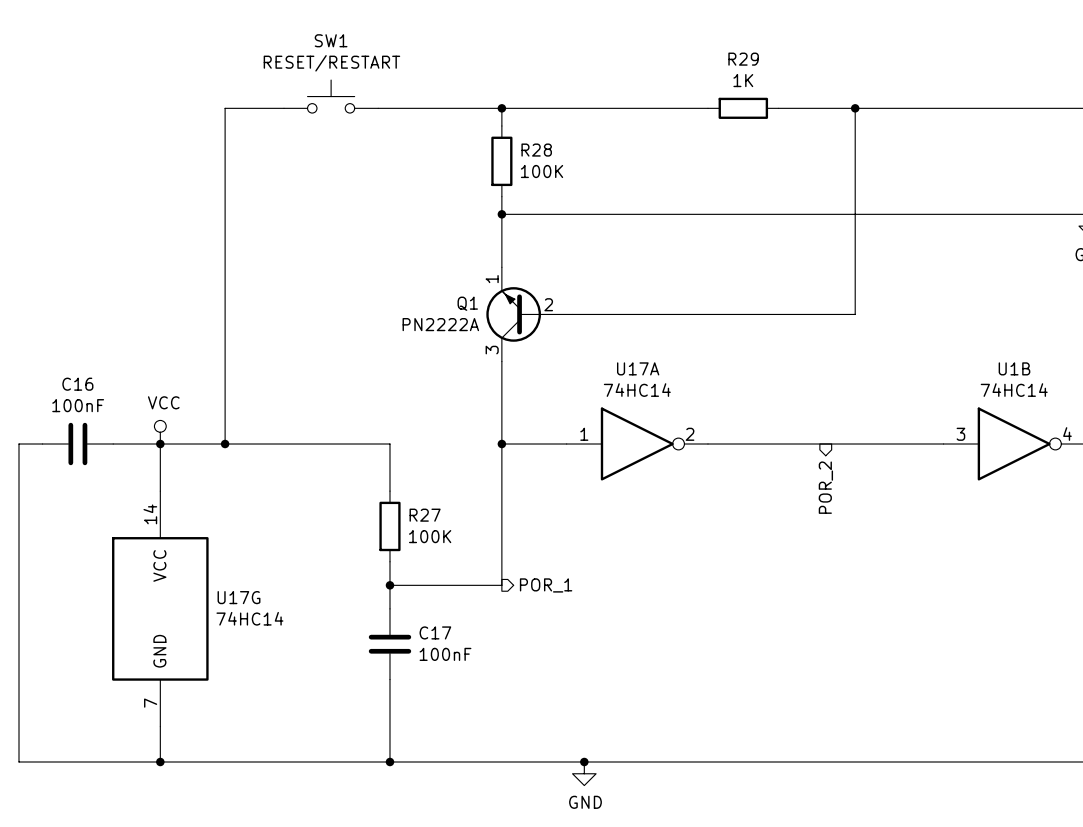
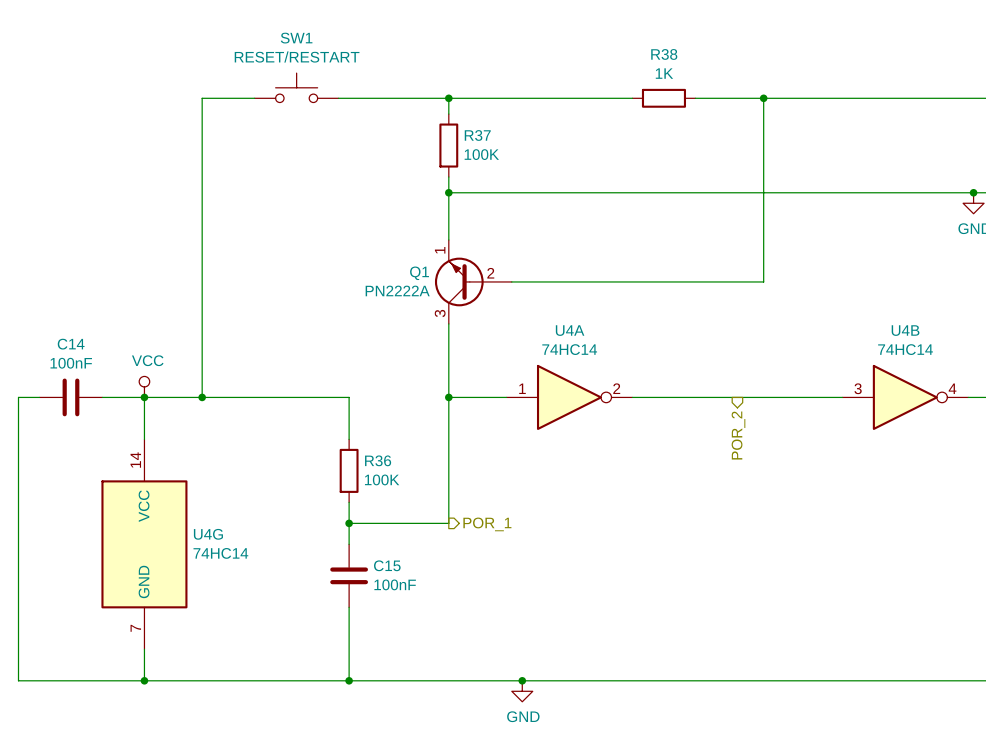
R29 name: R29 (743, 59) -> R38 (664, 54)
R28 name: R28 (536, 150) -> R37 (477, 135)
U17A name: U17A (638, 368) -> U4A (570, 330)
U1B name: U1B (1014, 368) -> U4B (905, 330)
C16 name: C16 (77, 384) -> C14 (71, 344)
R27 name: R27 (425, 515) -> R36 (378, 460)
U17G name: U17G (238, 597) -> U4G (208, 534)
C17 name: C17 (435, 632) -> C15 (387, 565)

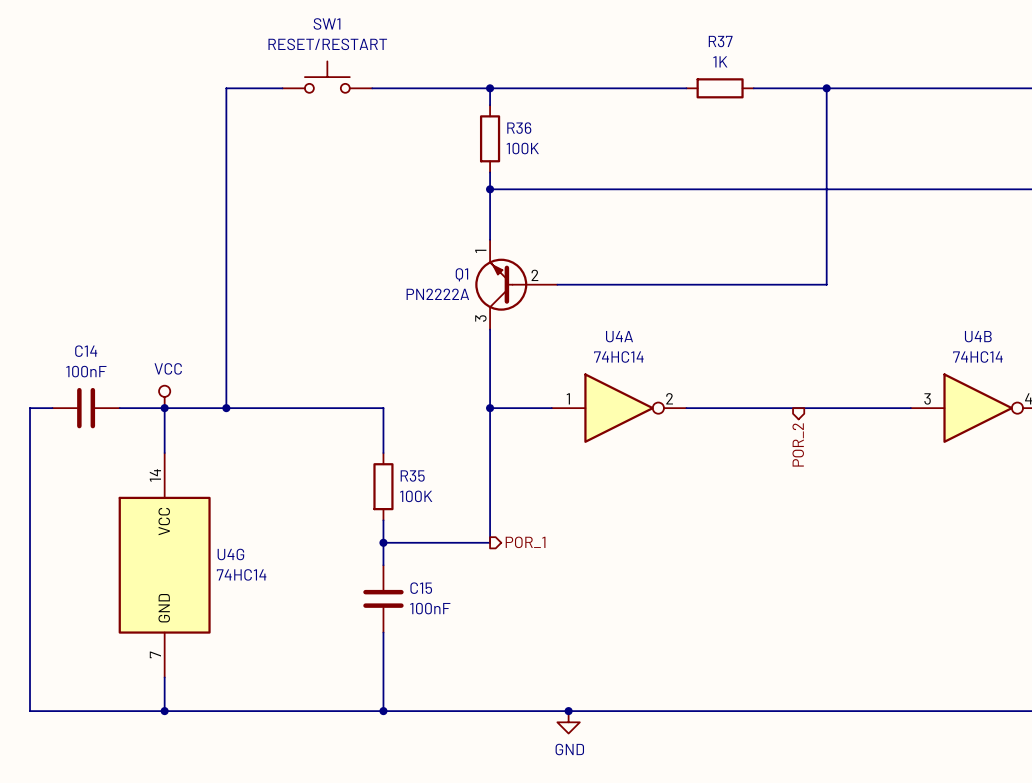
R38 name: R38 (664, 54) -> R37 (720, 41)
R37 name: R37 (477, 135) -> R36 (519, 128)
R36 name: R36 (378, 460) -> R35 (412, 476)

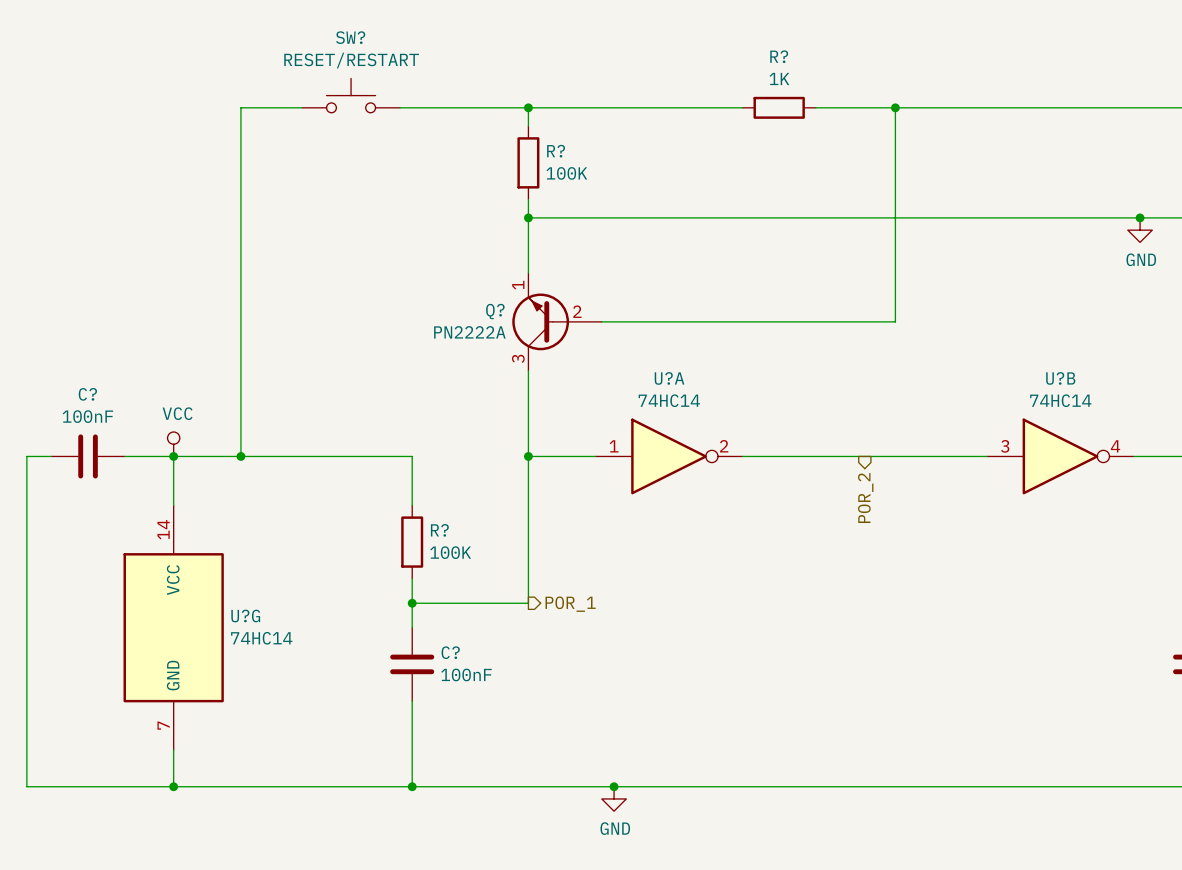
SW1 name: SW1 (327, 23) -> SW? (350, 37)
R37 name: R37 (720, 41) -> R? (779, 56)
R36 name: R36 (519, 128) -> R? (556, 151)
Q1 name: Q1 (461, 274) -> Q? (495, 311)
U4A name: U4A (619, 336) -> U?A (669, 378)
U4B name: U4B (978, 336) -> U?B (1060, 378)
C14 name: C14 (86, 351) -> C? (87, 394)
R35 name: R35 (412, 476) -> R? (439, 530)
U4G name: U4G (230, 554) -> U?G (245, 616)
C15 name: C15 (421, 588) -> C? (450, 652)

